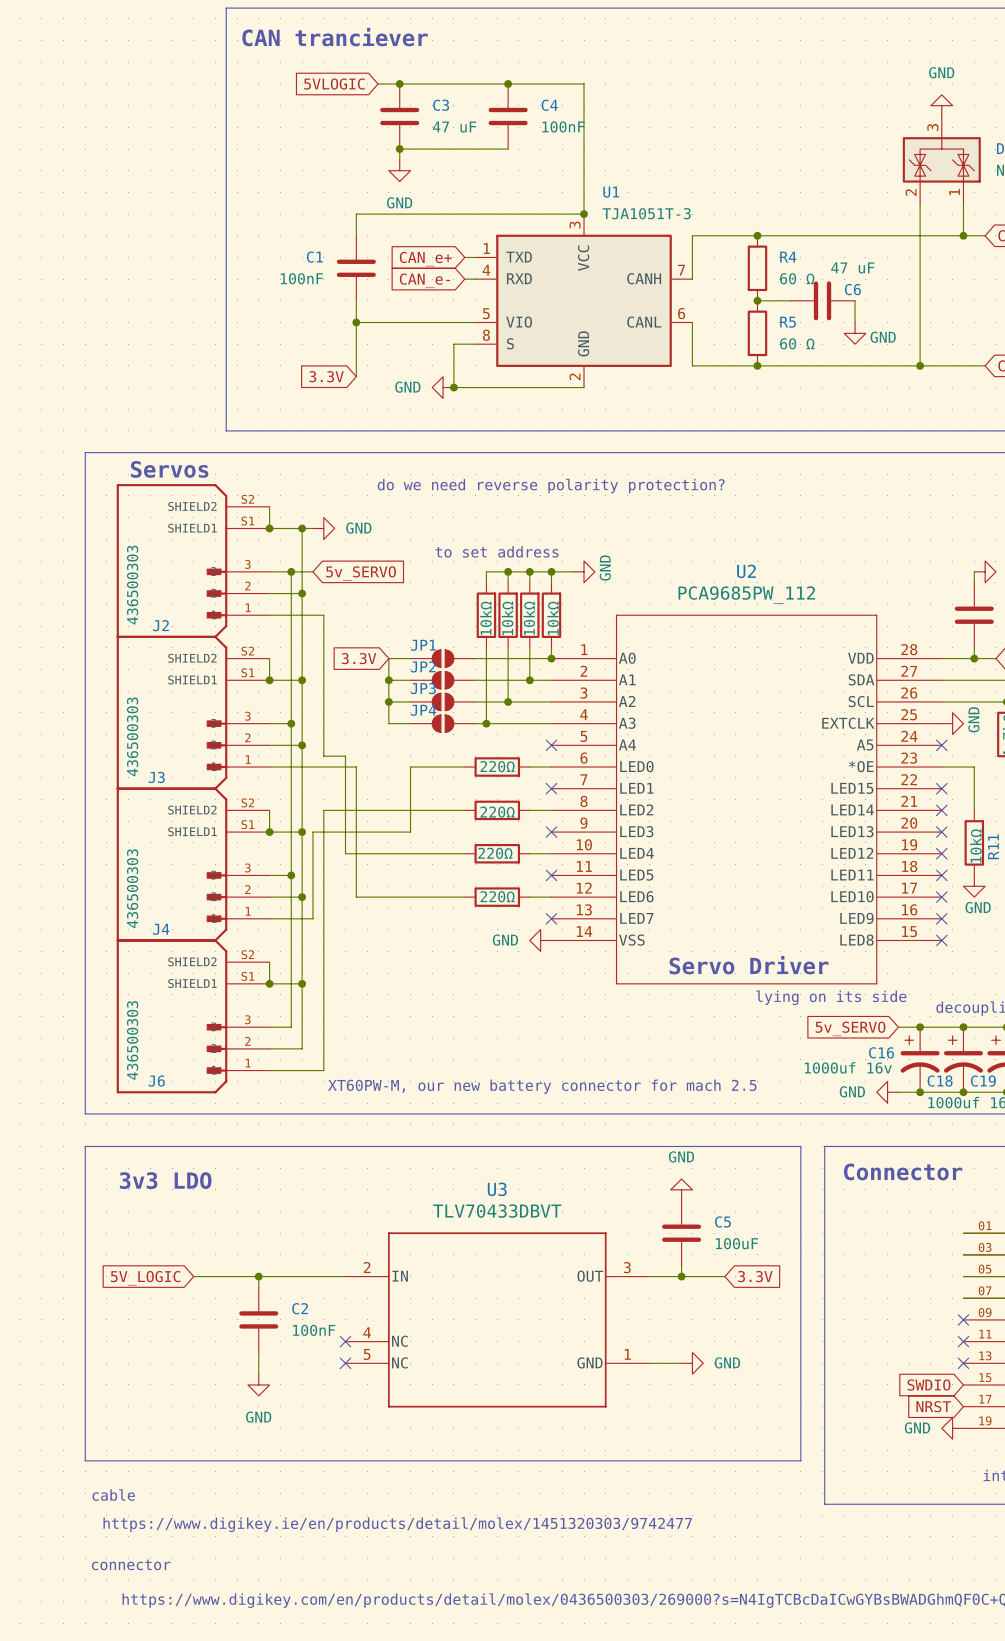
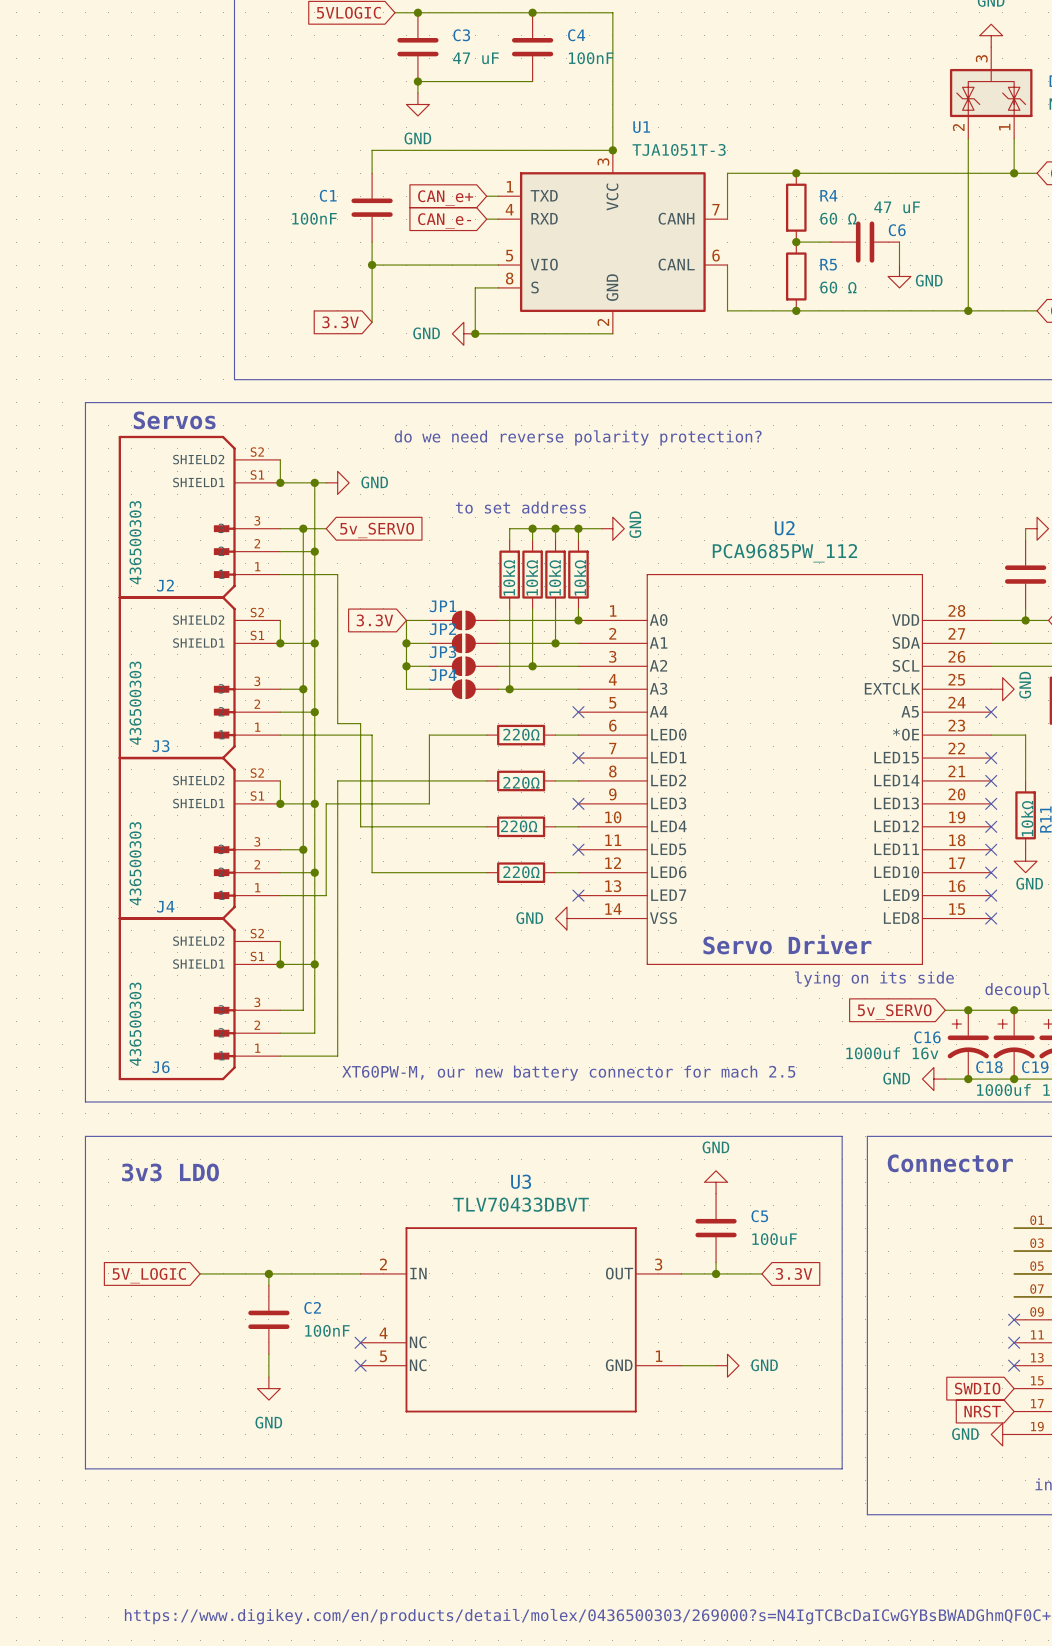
text: cable (113, 1495) -> none
text: https://www.digikey.ie/en/products/detail/molex/1451320303/9742477 (397, 1524) -> none
text: connector (131, 1564) -> none

